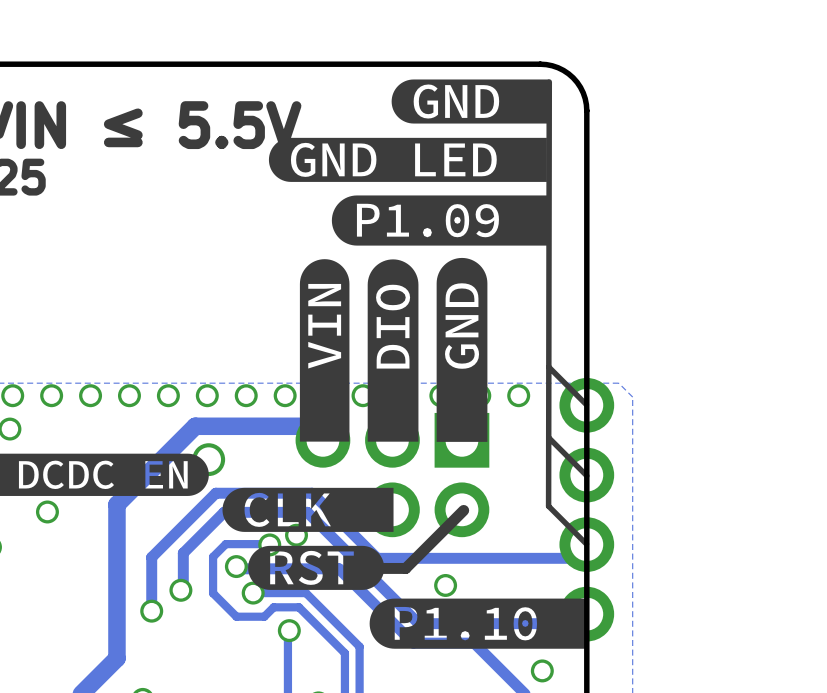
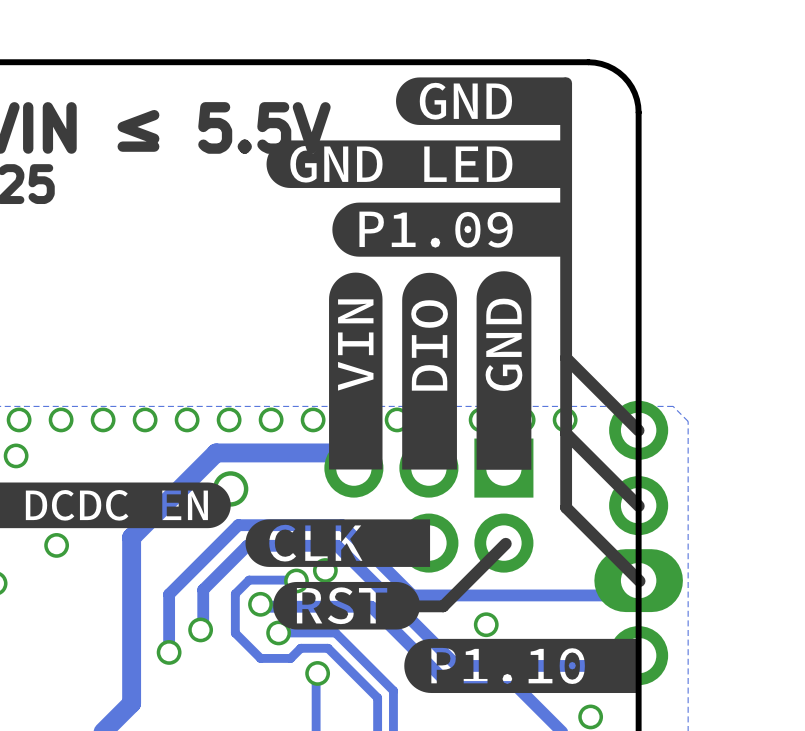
line: (549, 82) (548, 506) (586, 544) -> (566, 83) (566, 507) (639, 581)
drawing position: (470, 101) -> (481, 101)
drawing position: (407, 159) -> (416, 164)
drawing position: (440, 220) -> (449, 229)
line width: thin (548, 367) (586, 404) -> thick (597, 389) (638, 429)
line: (548, 437) (586, 475) -> (566, 433) (638, 506)
part footprint: [559, 517, 615, 572] -> [594, 549, 683, 613]

